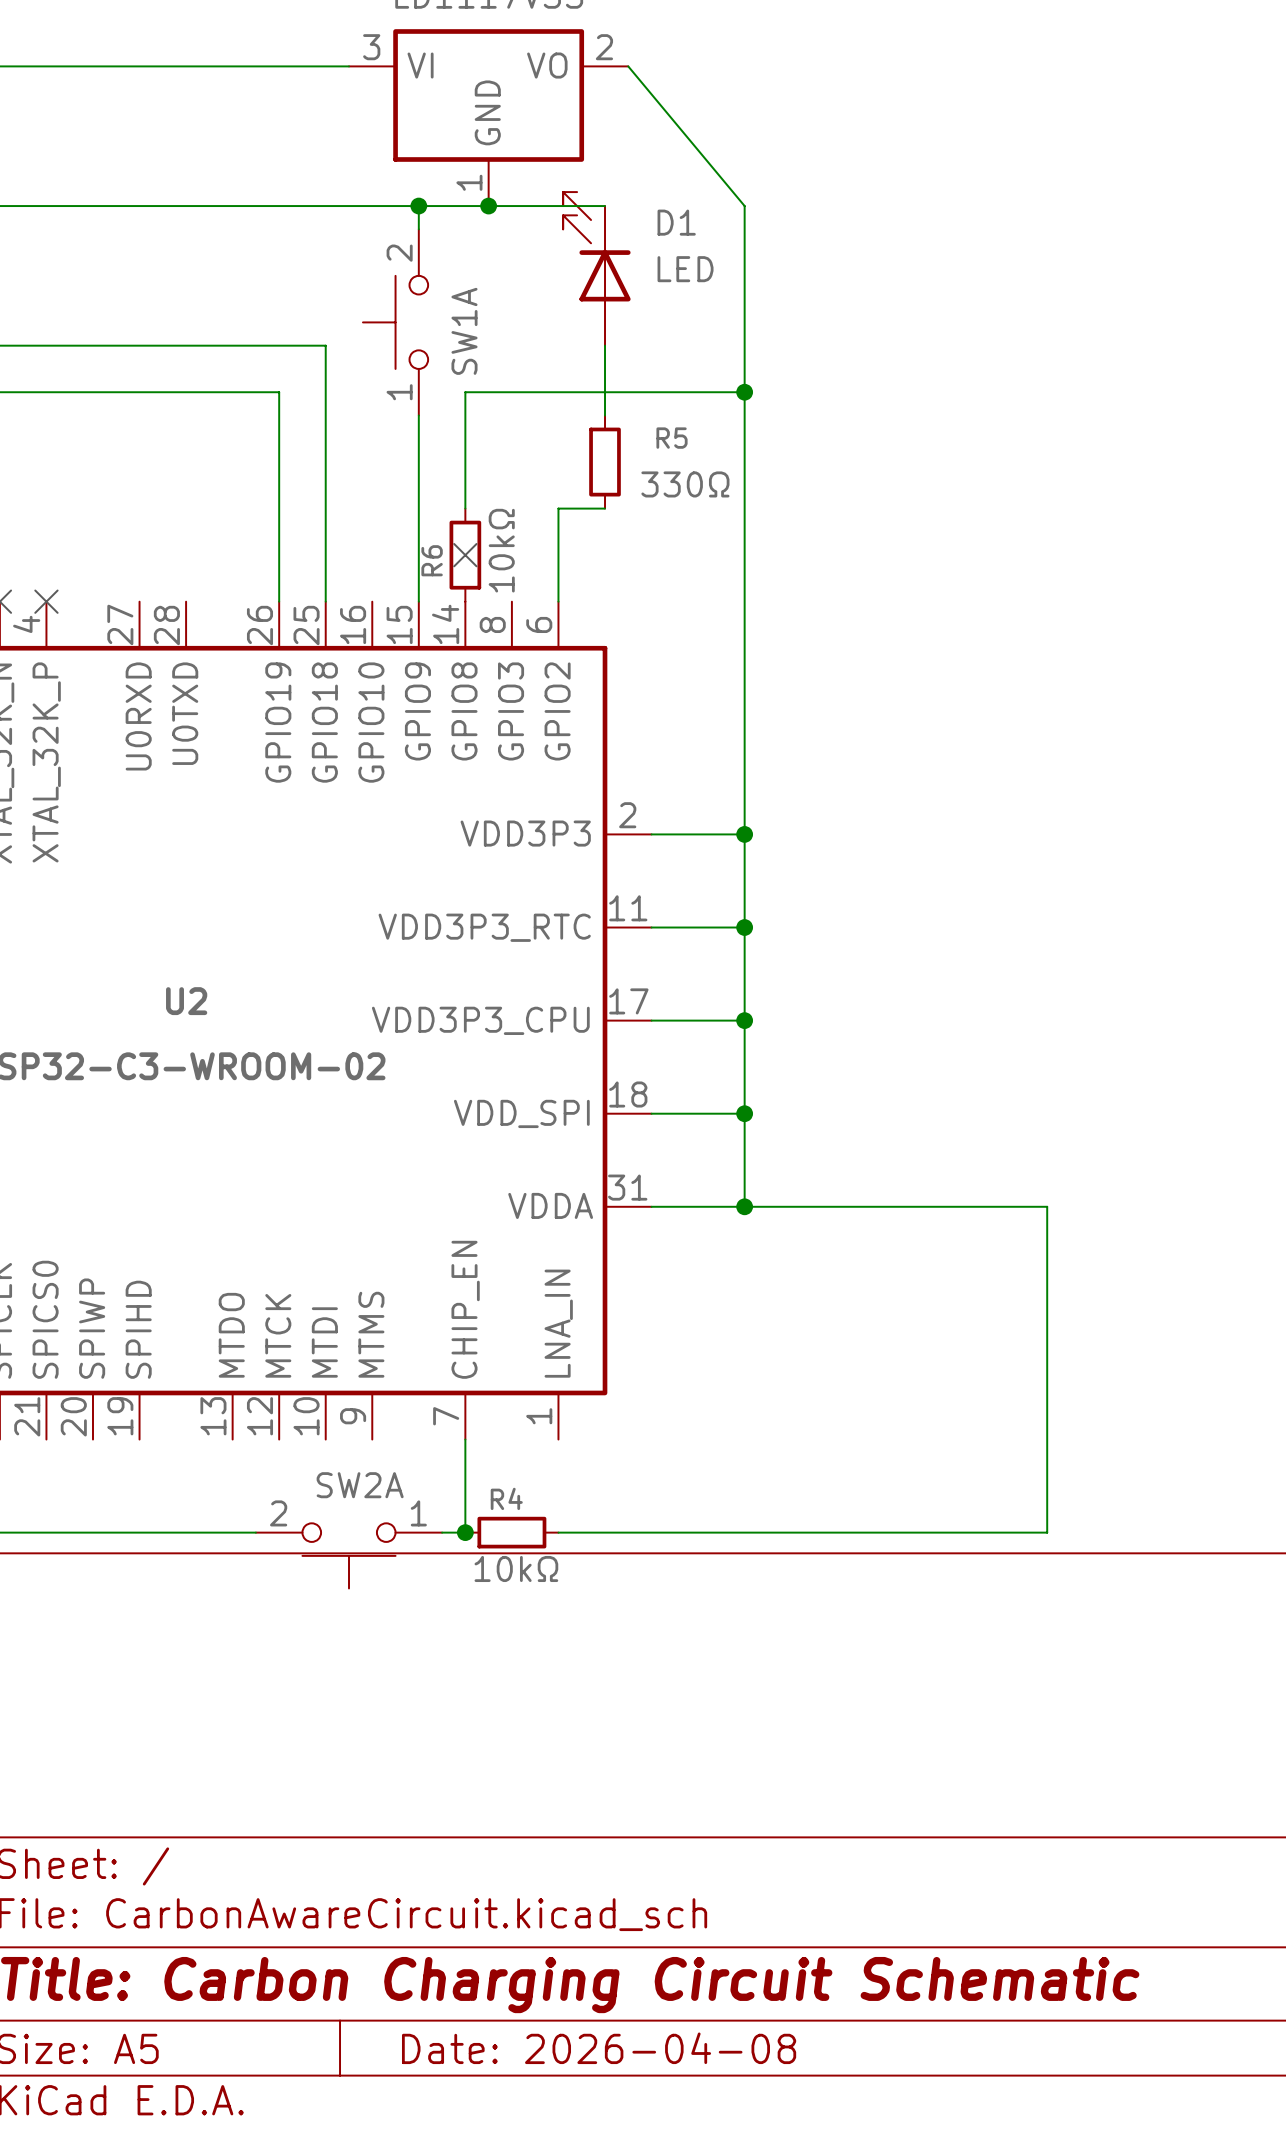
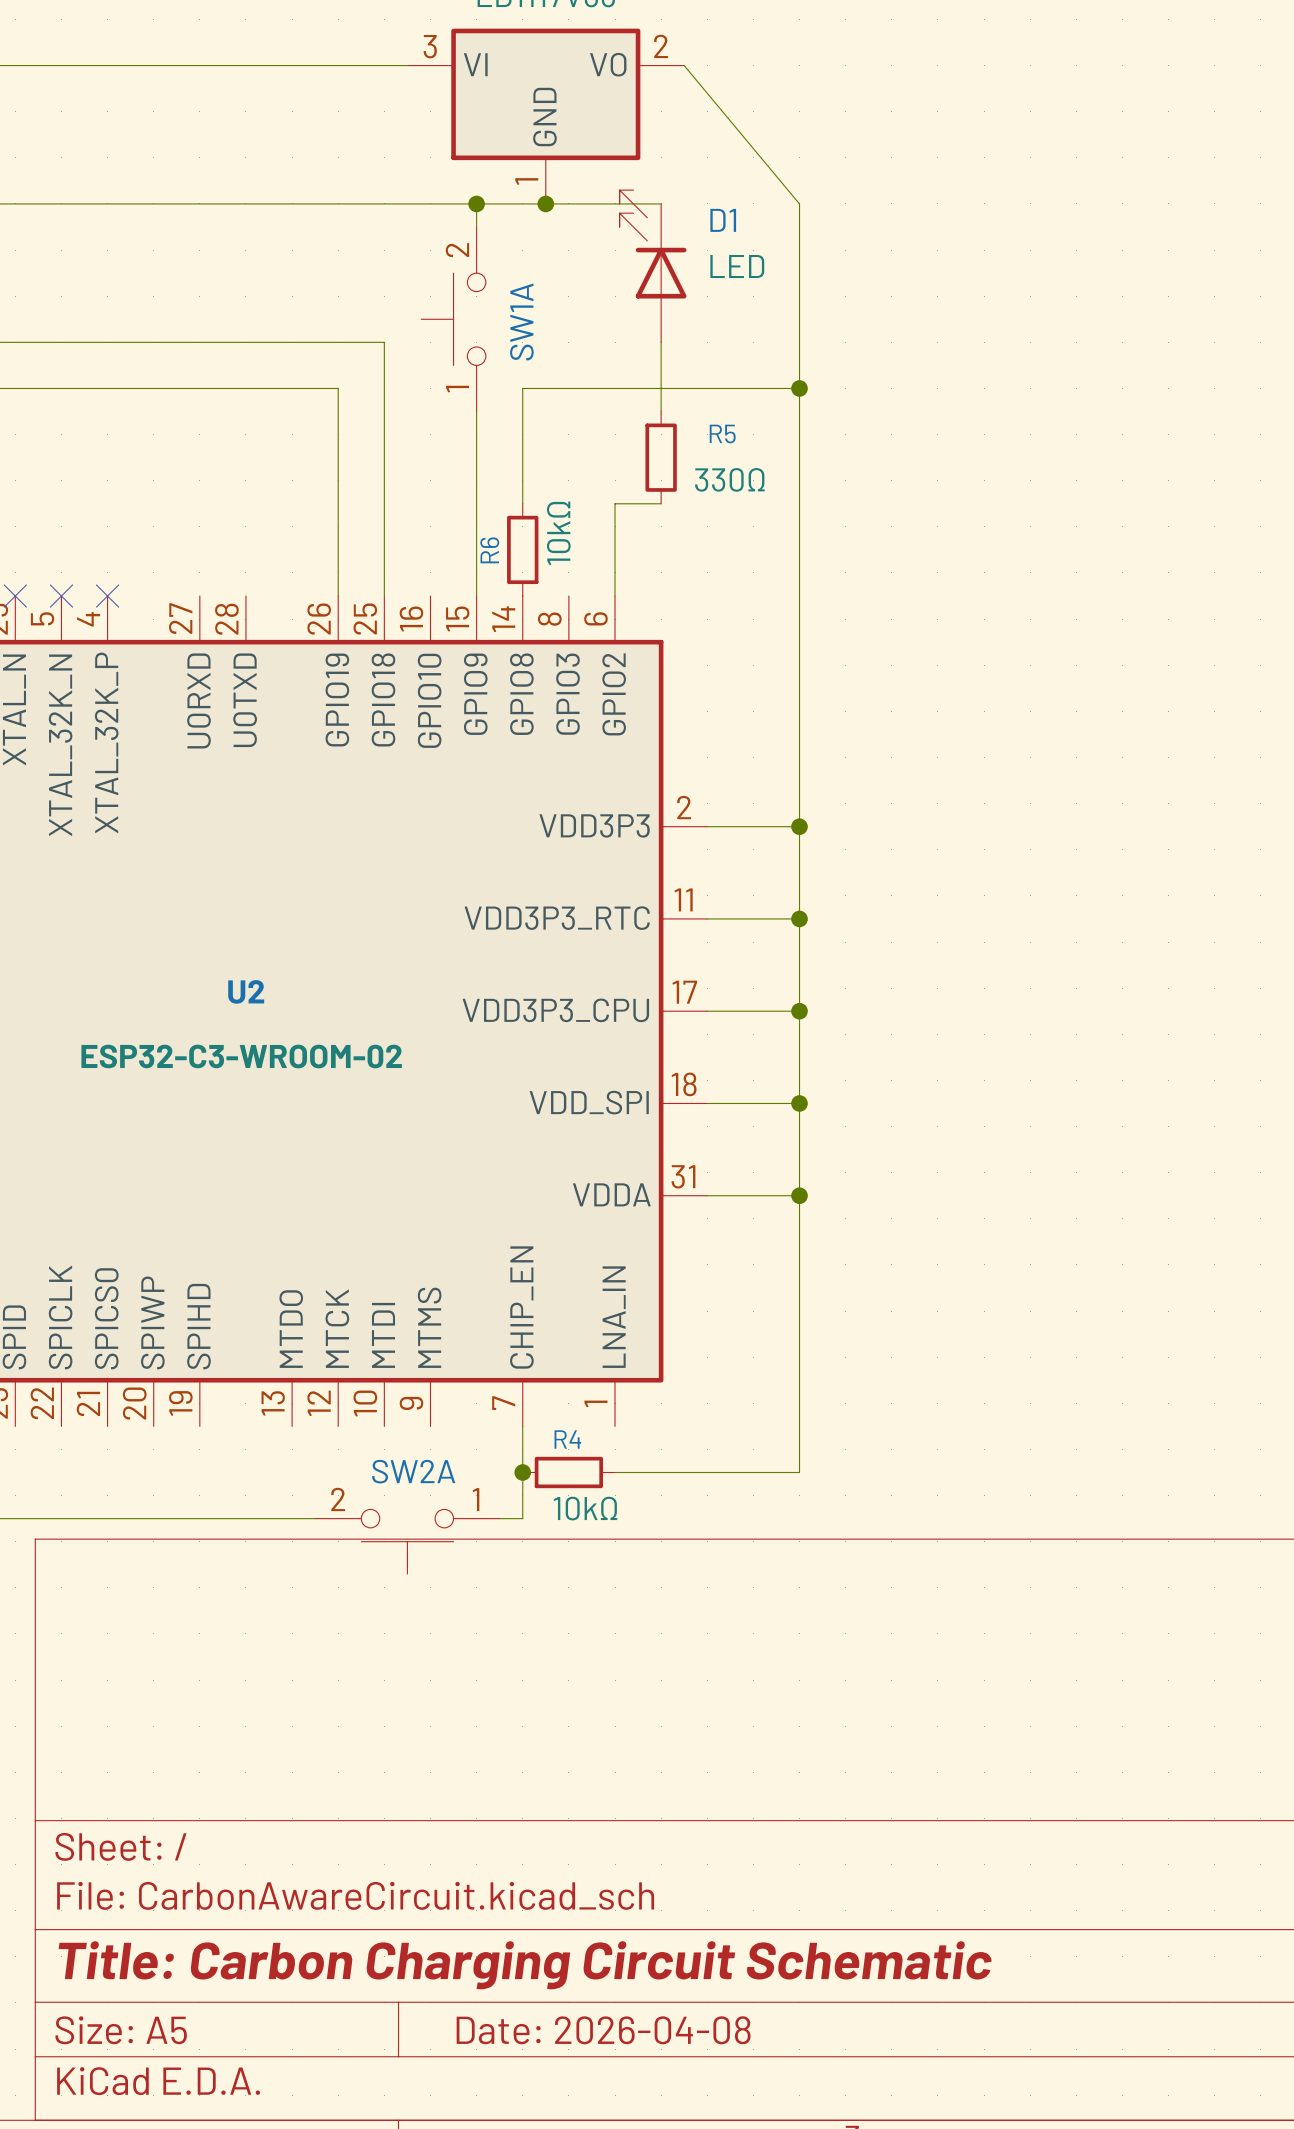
no-connect mark: (465, 555) -> none
wire: (744, 1206) (1047, 1206) (1047, 1532) (558, 1532) -> (799, 1195) (799, 1472) (615, 1472)
junction position: (465, 1532) -> (522, 1472)
R4 position: (511, 1532) -> (568, 1472)

